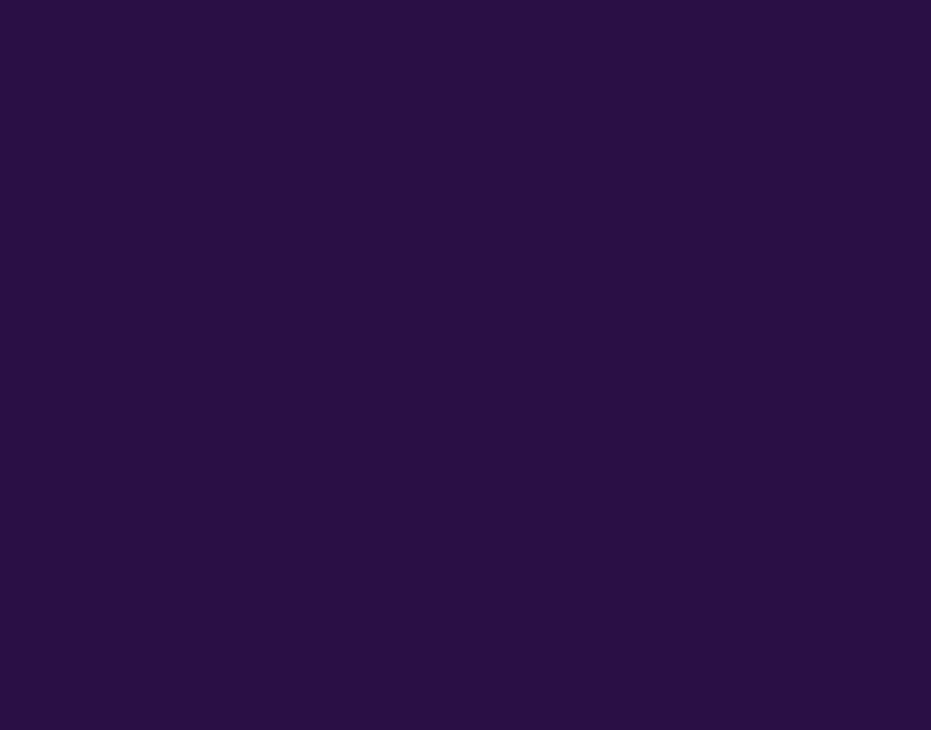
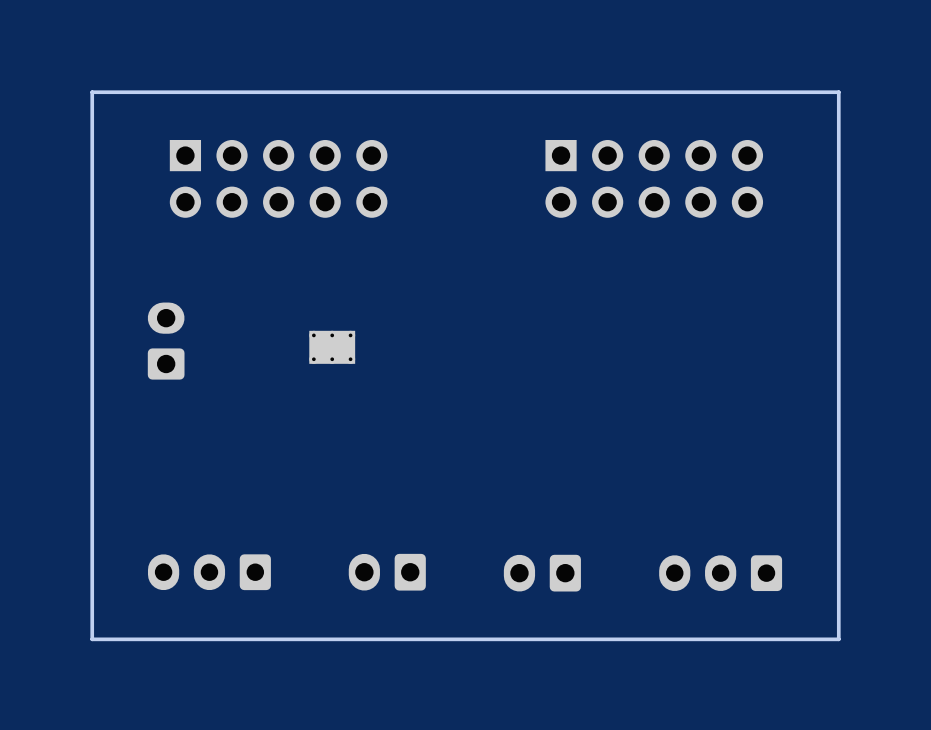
board edge: none -> (838, 92) (92, 92) (92, 639) (838, 639) (838, 92)
part: none -> (278, 178)
part: none -> (654, 178)
part: none -> (166, 341)
part: none -> (332, 347)
part: none -> (209, 572)
part: none -> (387, 572)
part: none -> (542, 573)
part: none -> (720, 573)

